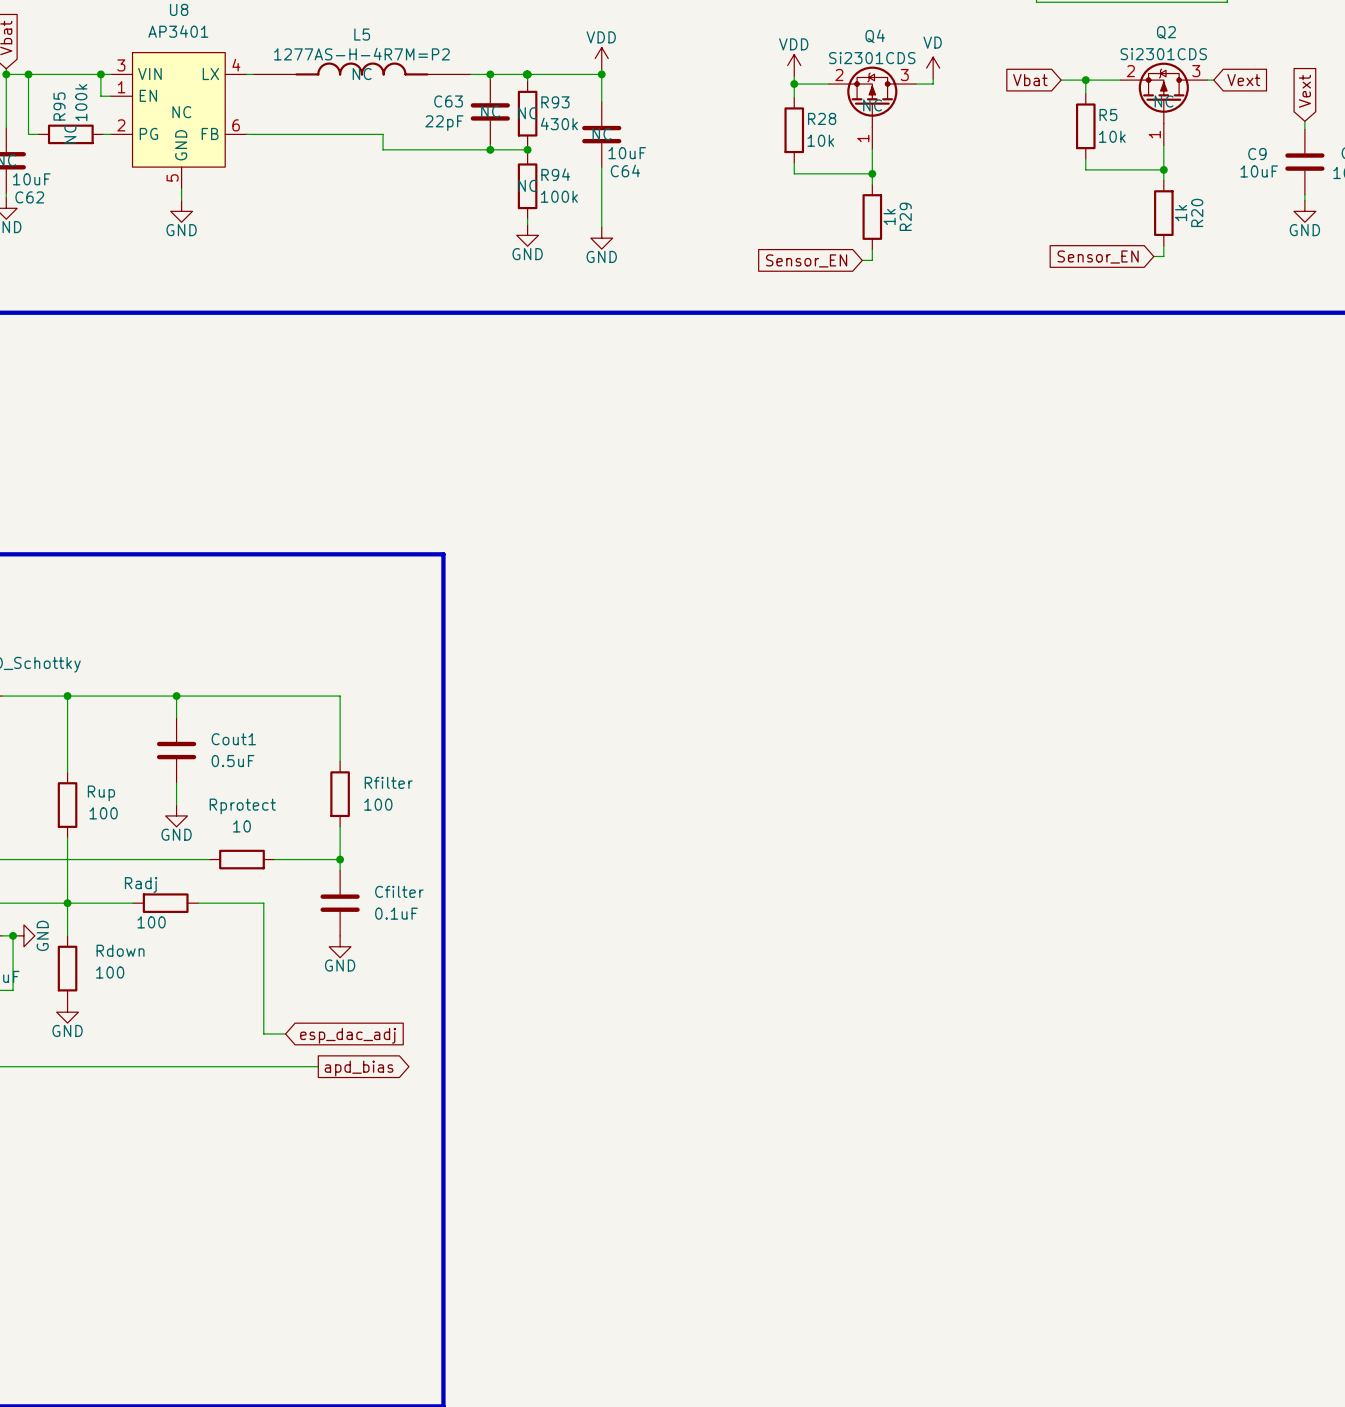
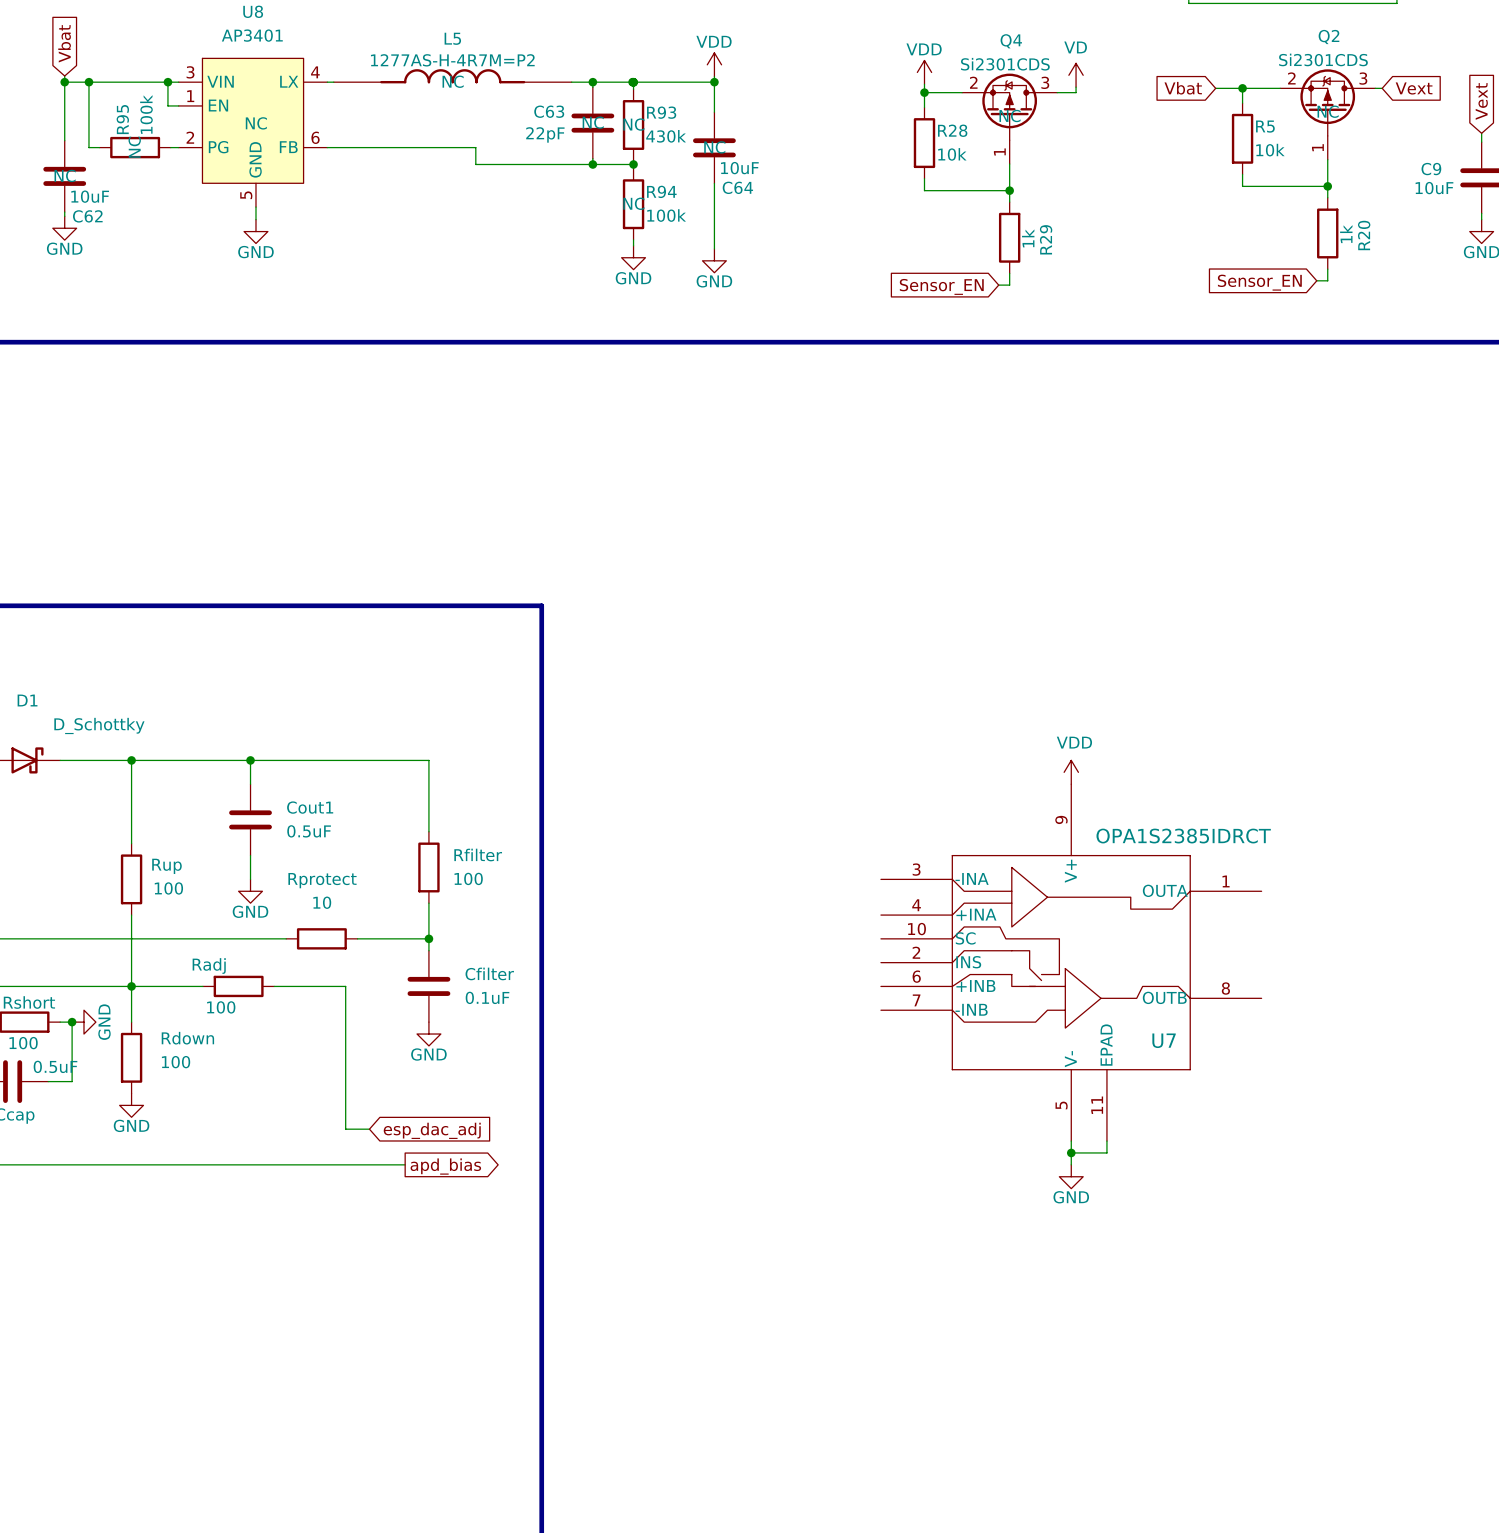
power symbol: none -> VDD (1071, 772)
U7: none -> OPA1S2385IDRCT (1071, 962)
wire: none -> (1071, 1141) (1071, 1164)
wire: none -> (1106, 1141) (1106, 1152) (1071, 1152)
junction: none -> (1071, 1152)
power symbol: none -> GND (1071, 1176)

